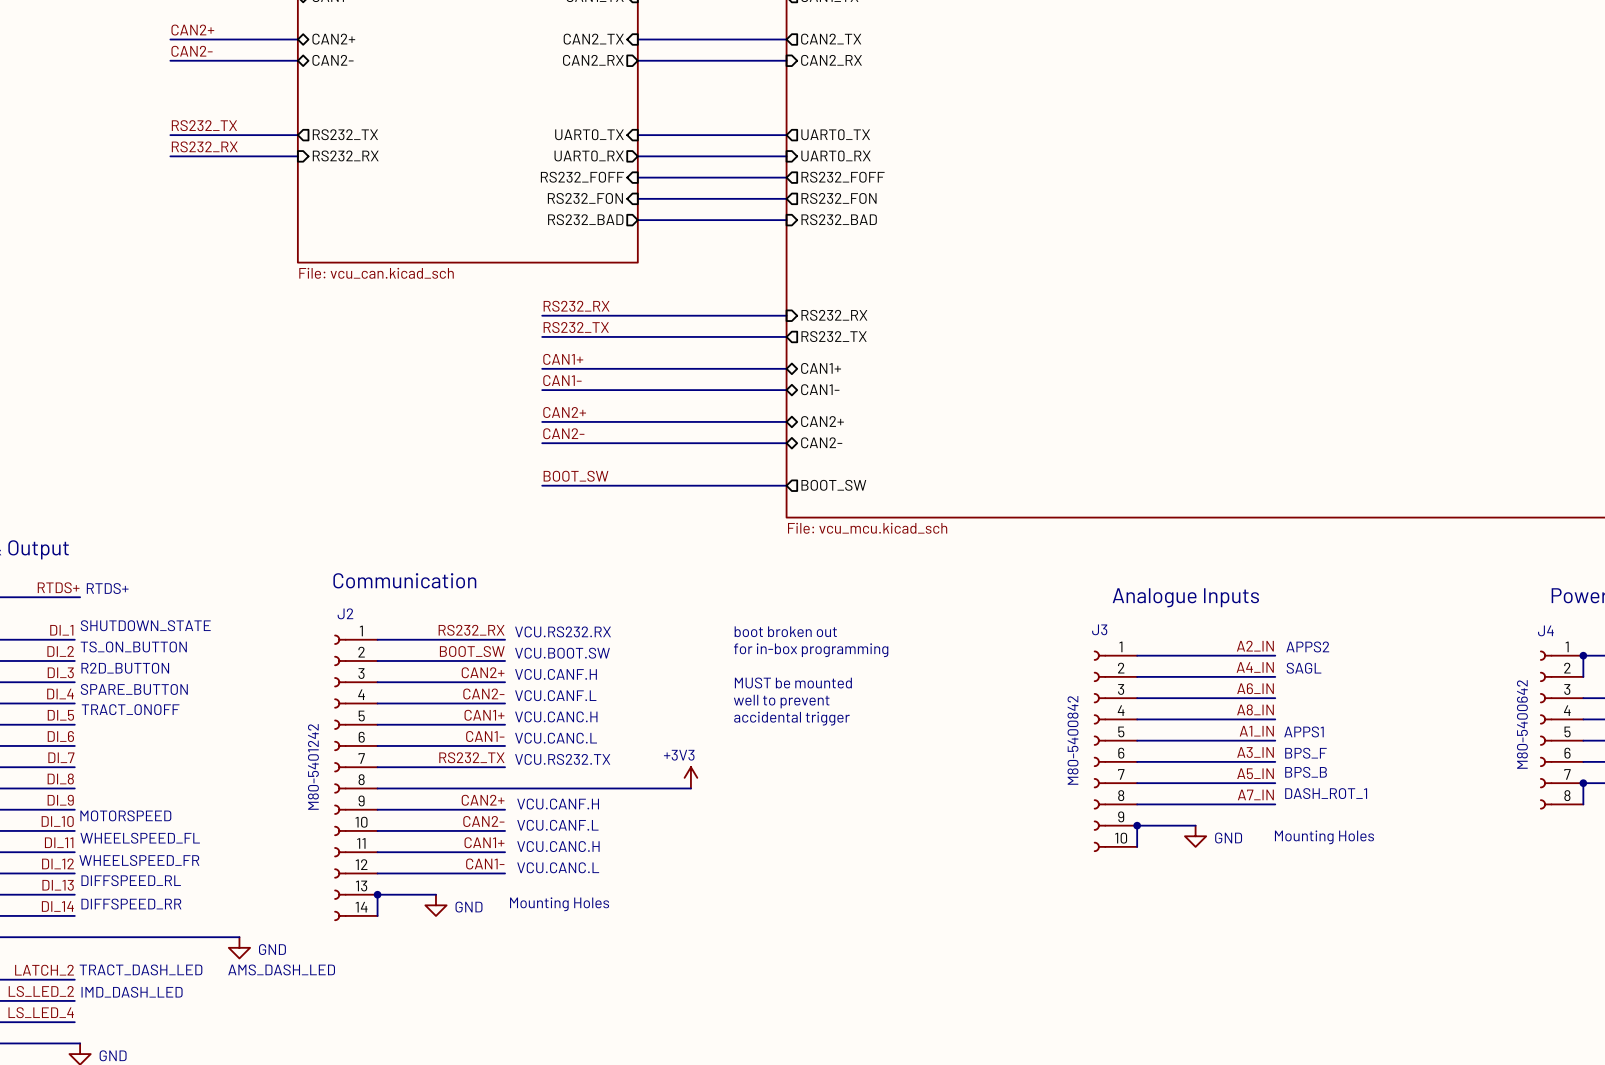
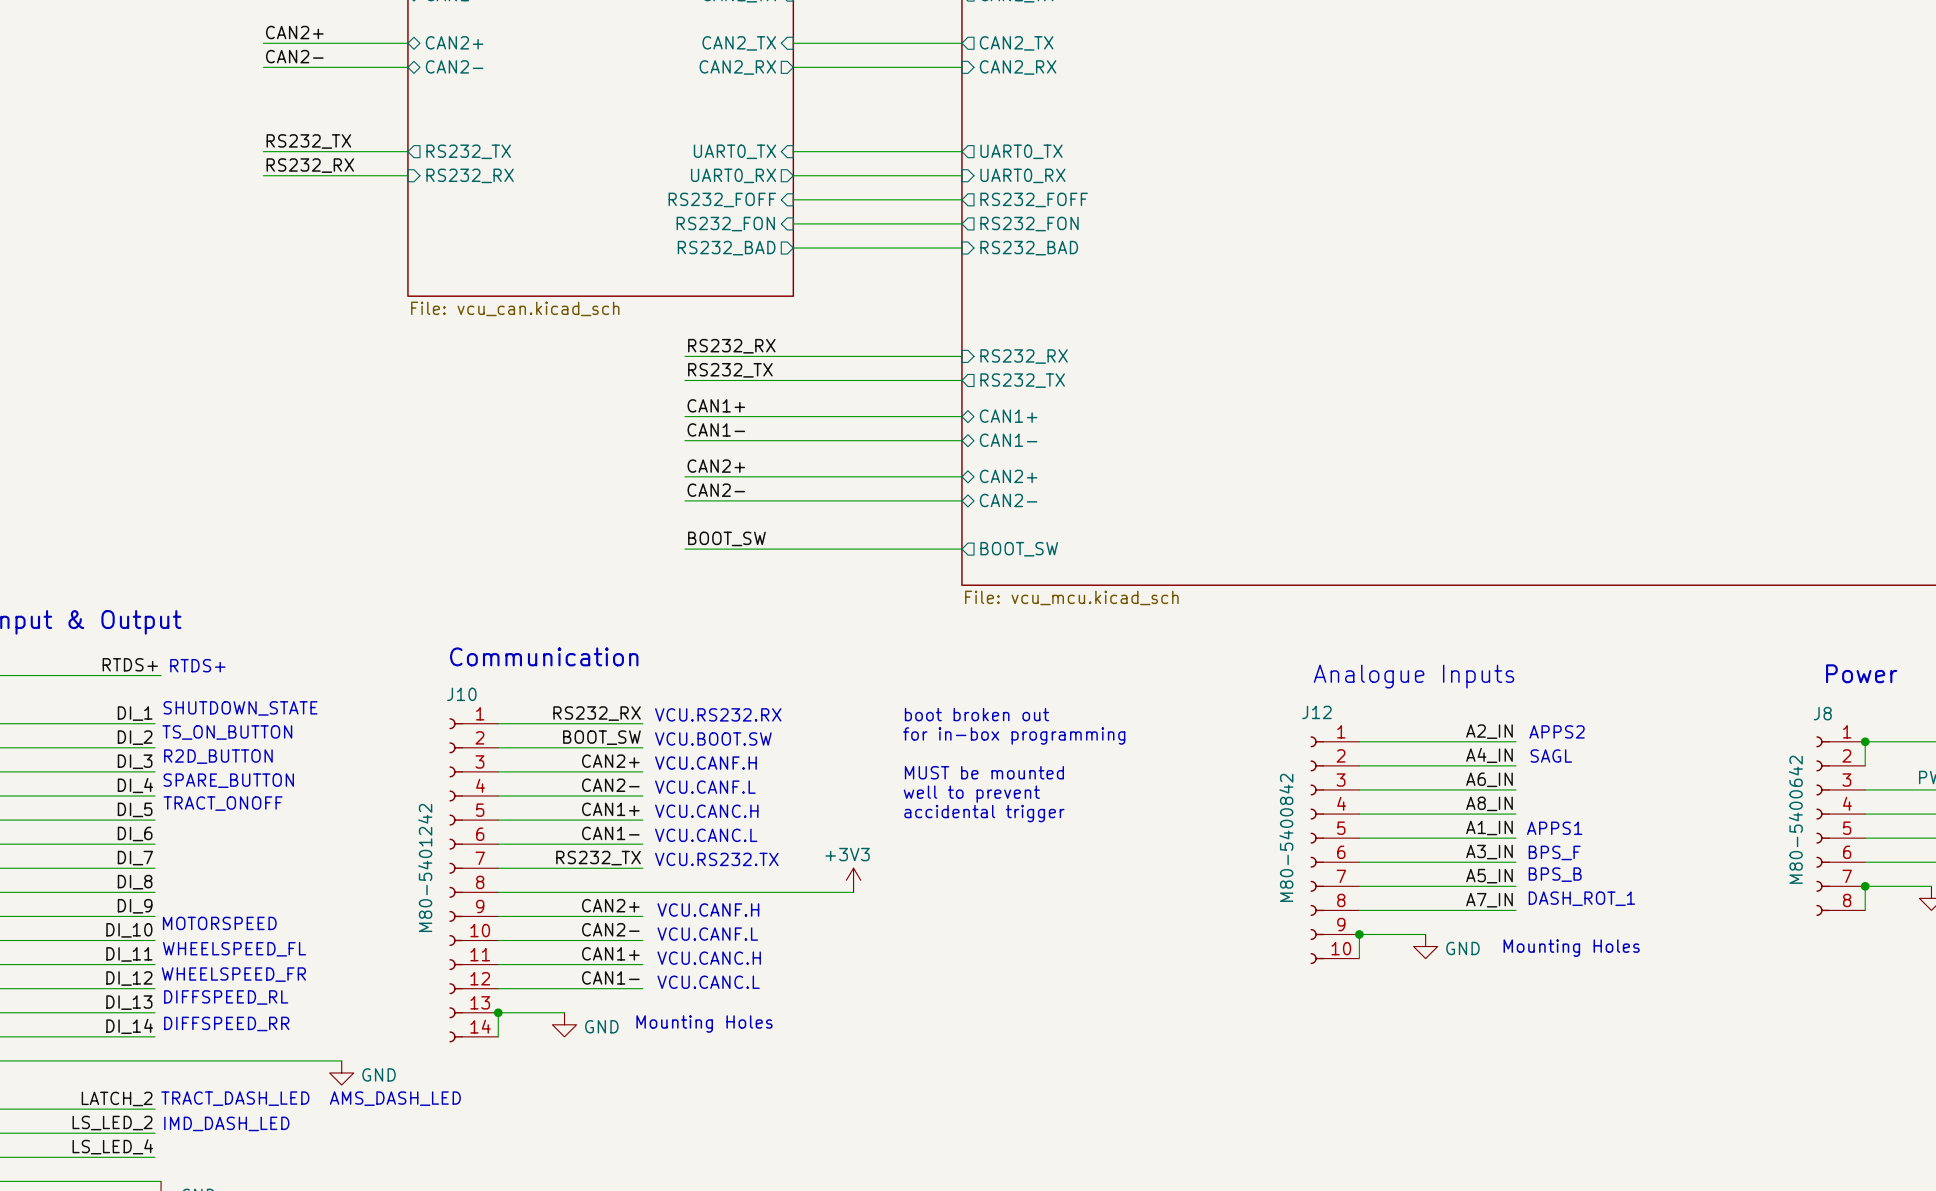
J2 name: J2 (345, 613) -> J10 (461, 694)
J3 name: J3 (1099, 629) -> J12 (1316, 712)
J4 name: J4 (1545, 630) -> J8 (1822, 713)

